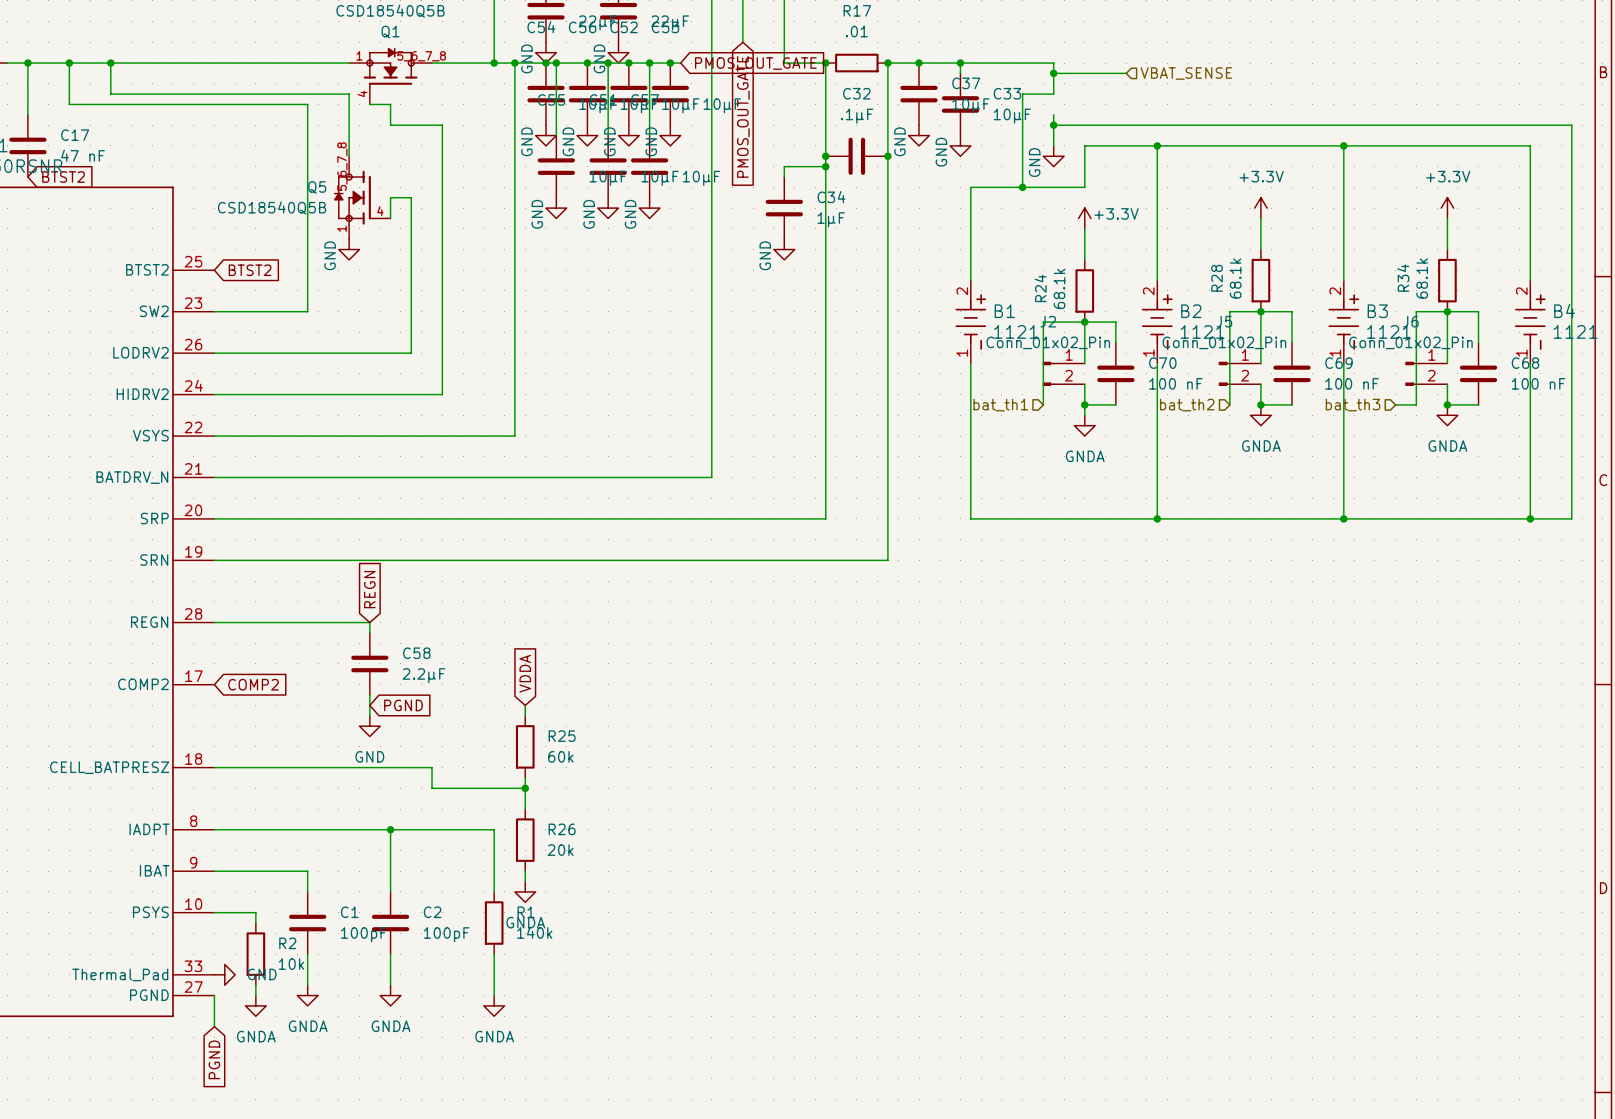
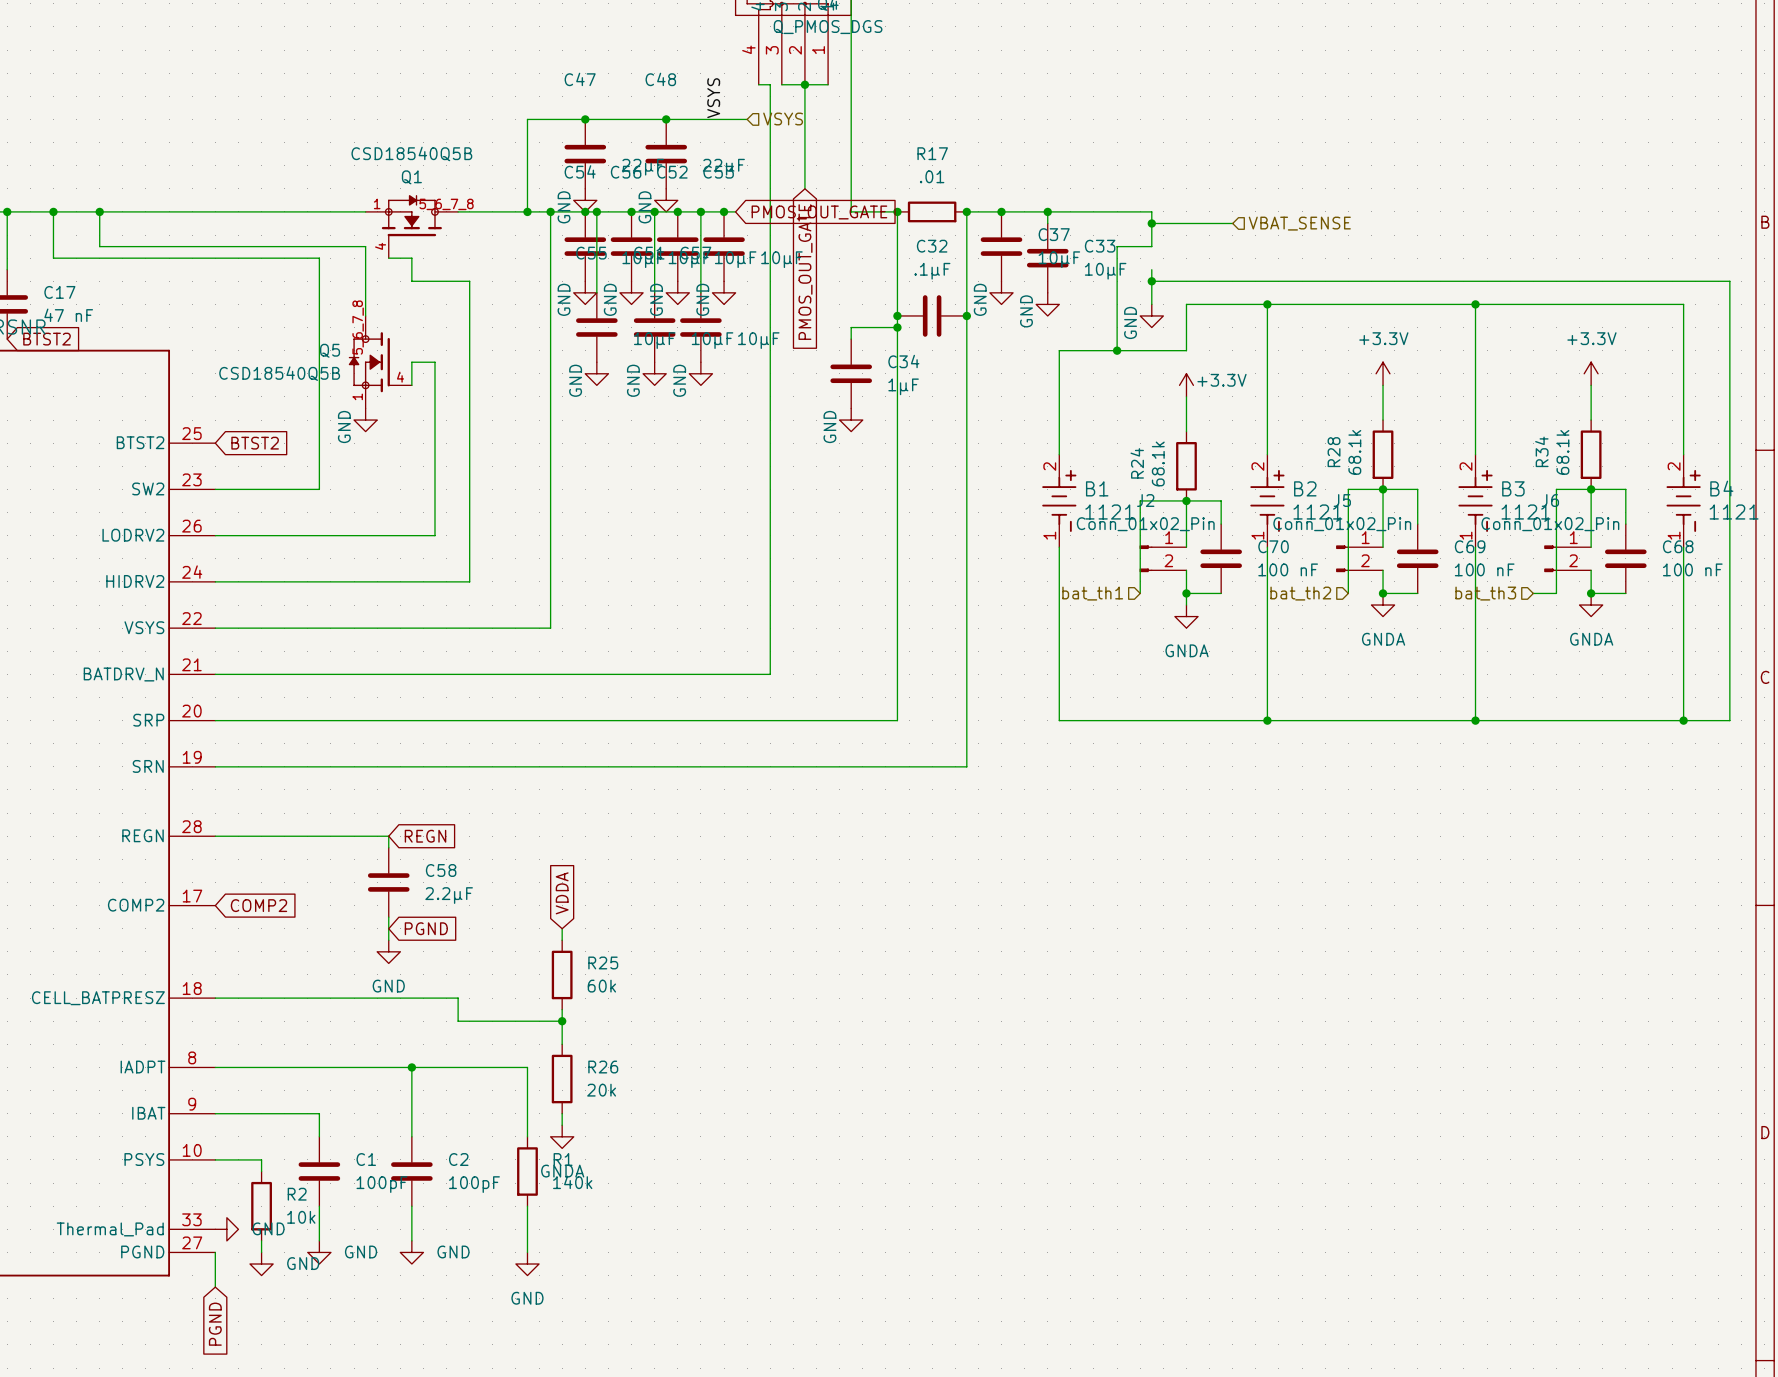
global label rotation: 0° (369, 589) -> 90° clockwise (425, 836)
power symbol: GNDA (307, 995) -> GND (319, 1252)
power symbol: GNDA (390, 995) -> GND (411, 1252)
power symbol: GNDA (255, 1005) -> GND (261, 1264)
power symbol: GNDA (494, 1005) -> GND (527, 1264)

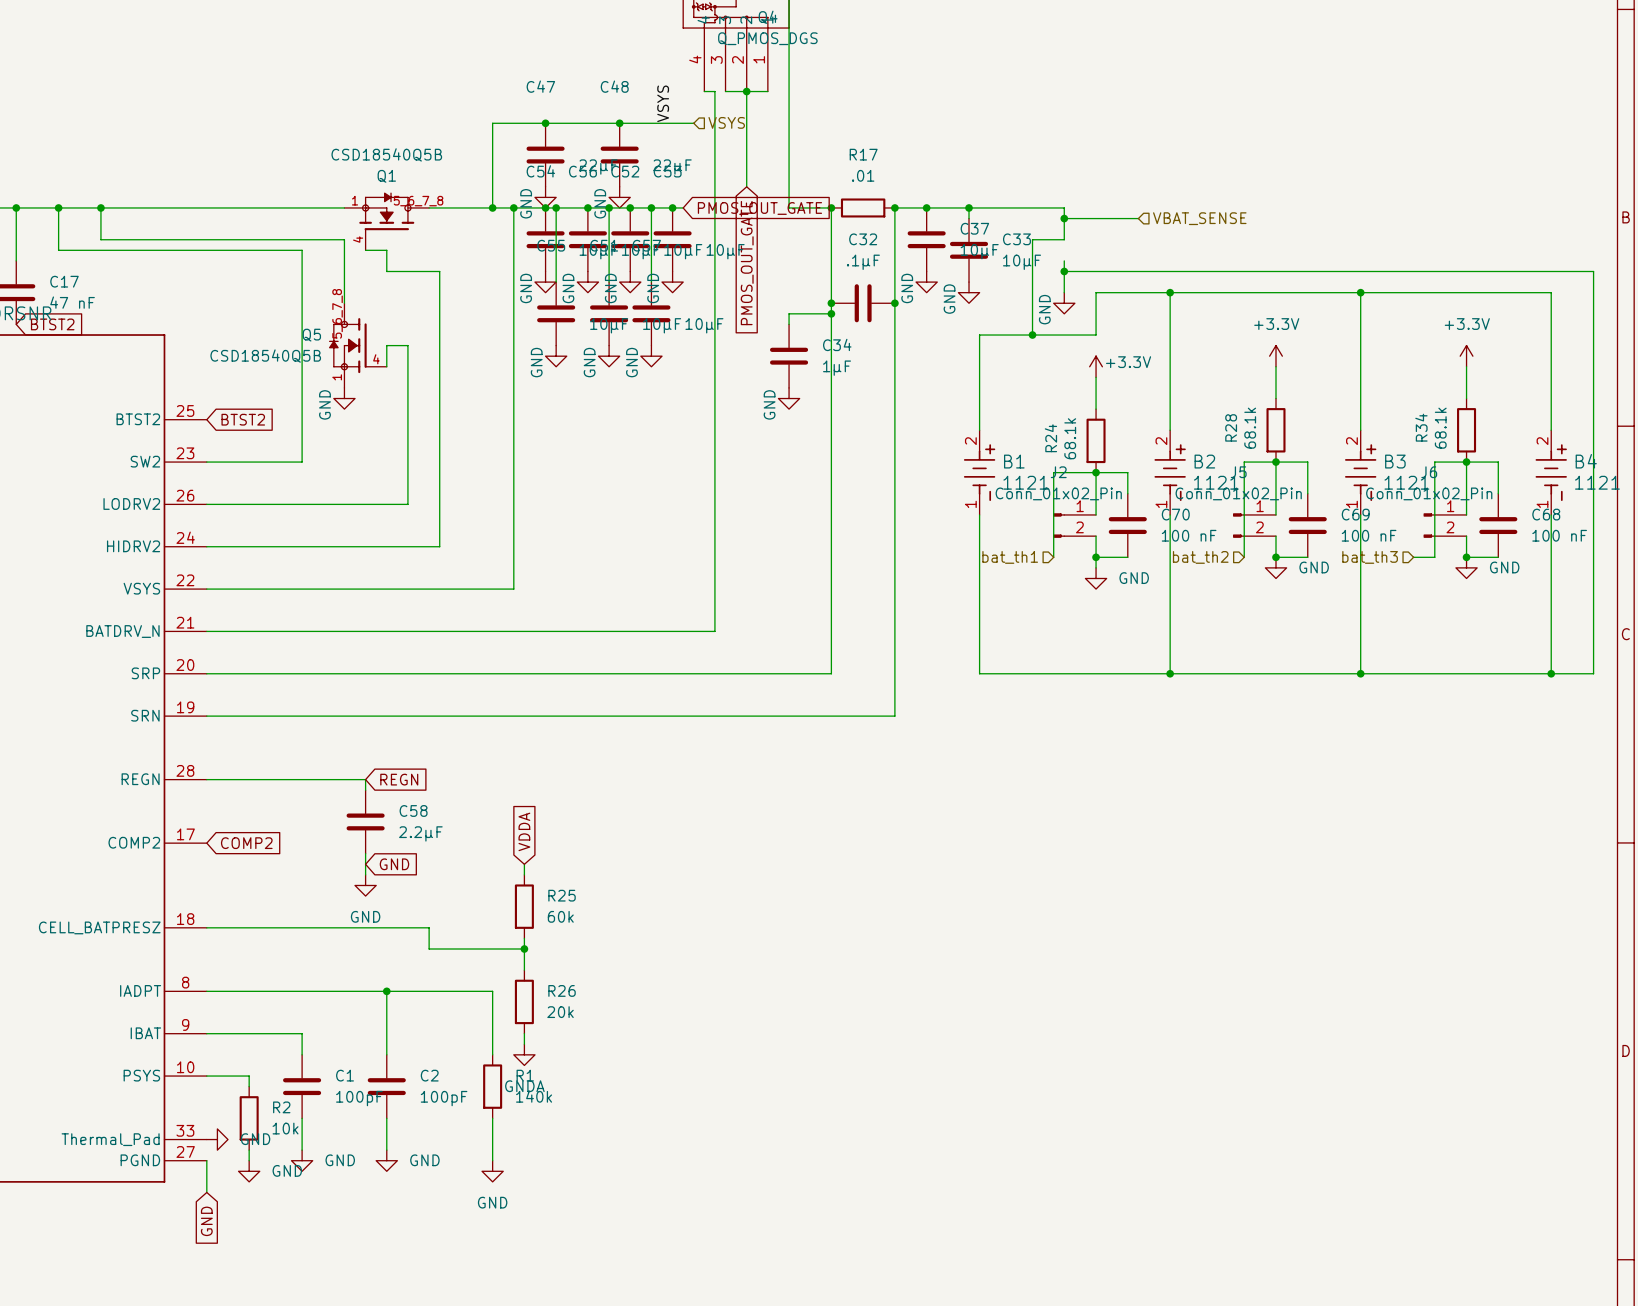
power symbol: GNDA (1383, 605) -> GND (1276, 567)
power symbol: GNDA (1591, 605) -> GND (1466, 567)
power symbol: GNDA (1186, 616) -> GND (1096, 578)
global label: PGND (426, 928) -> GND (394, 864)
global label: PGND (215, 1324) -> GND (206, 1221)

